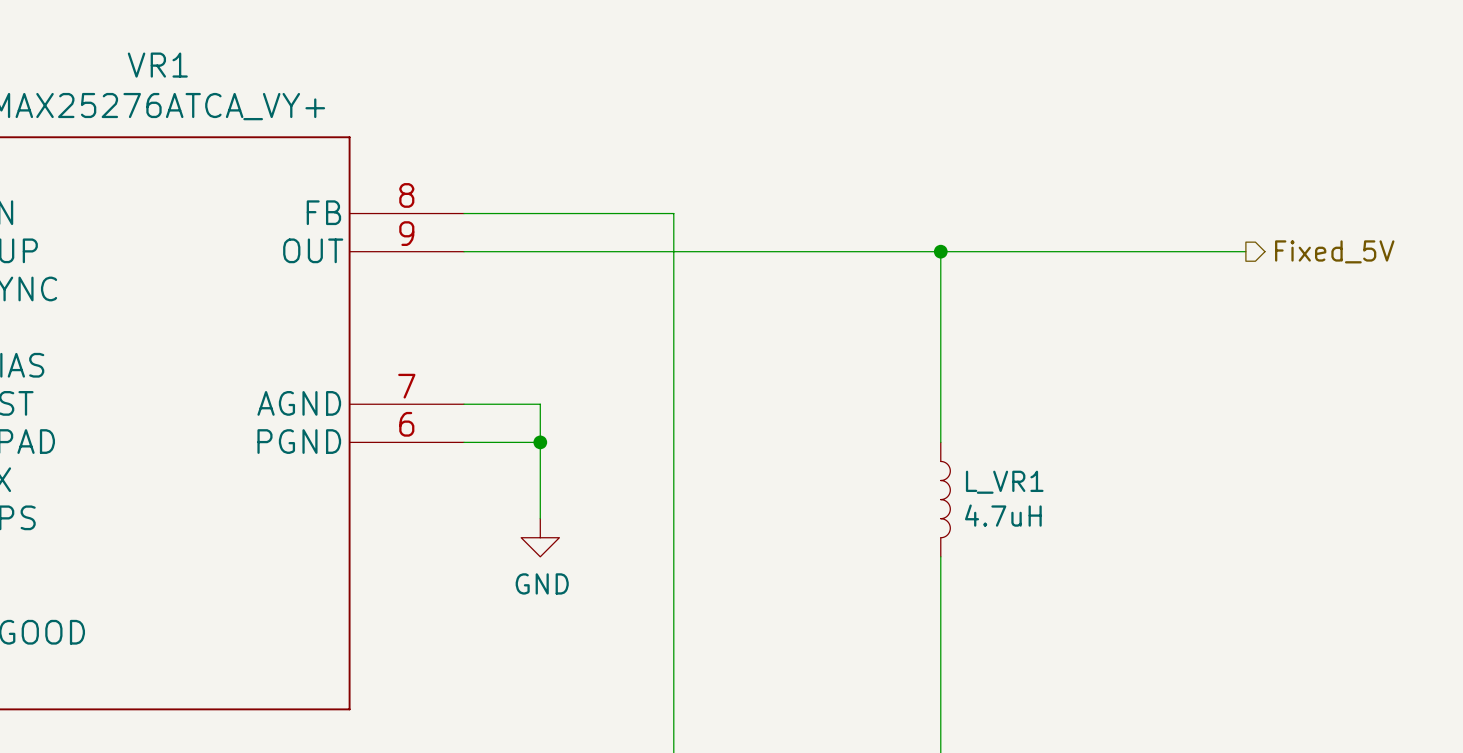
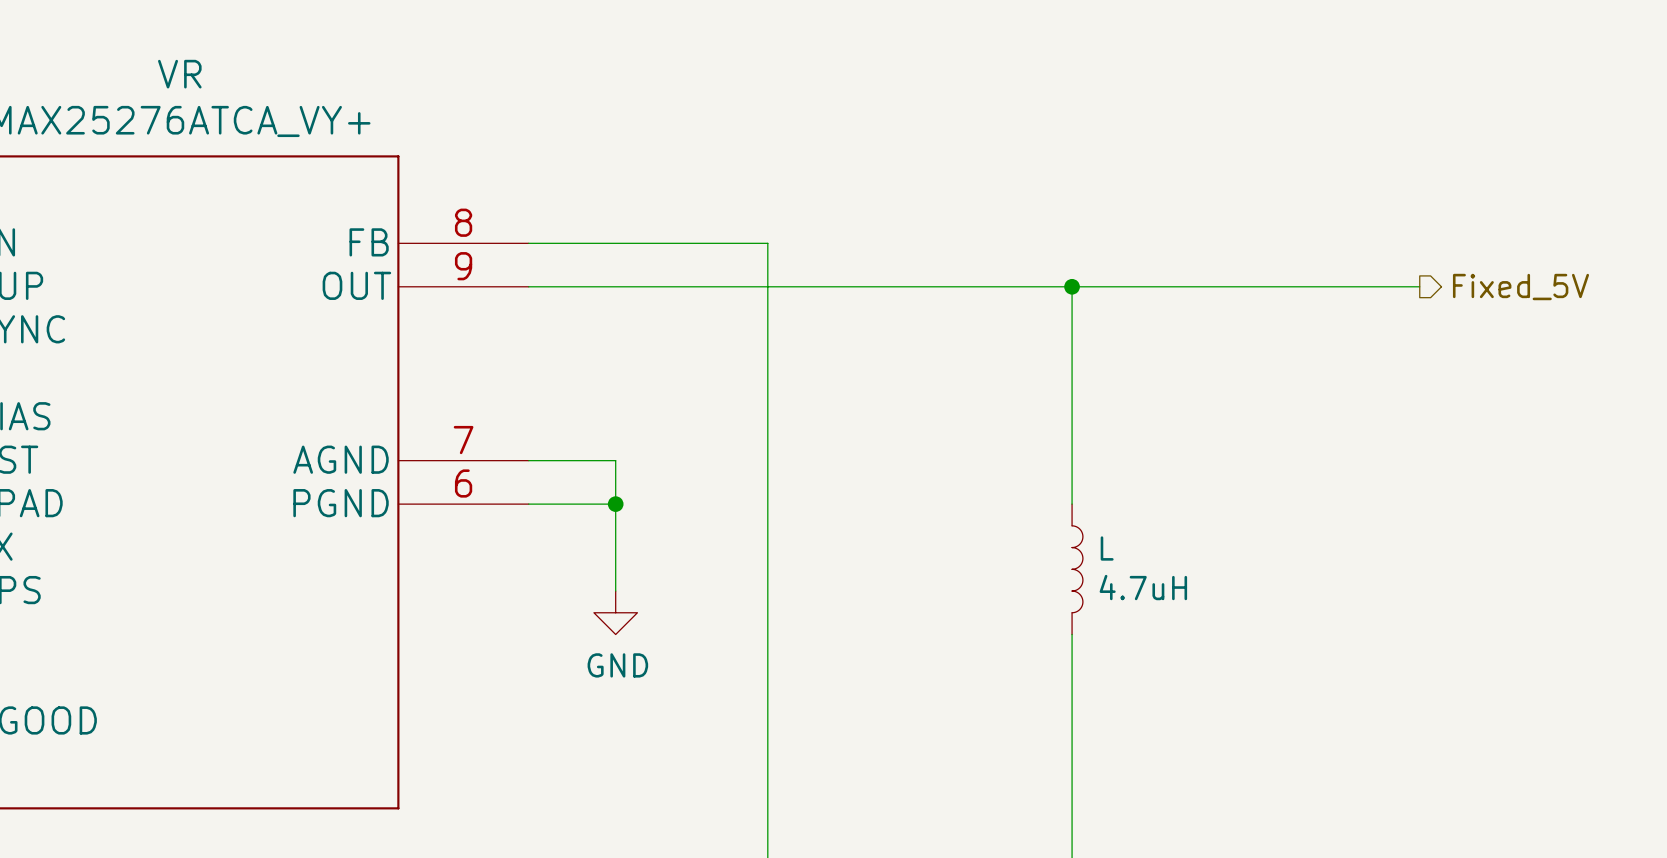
VR1 name: VR1 (157, 65) -> VR (179, 74)
L_VR1 name: L_VR1 (1004, 482) -> L (1107, 548)

